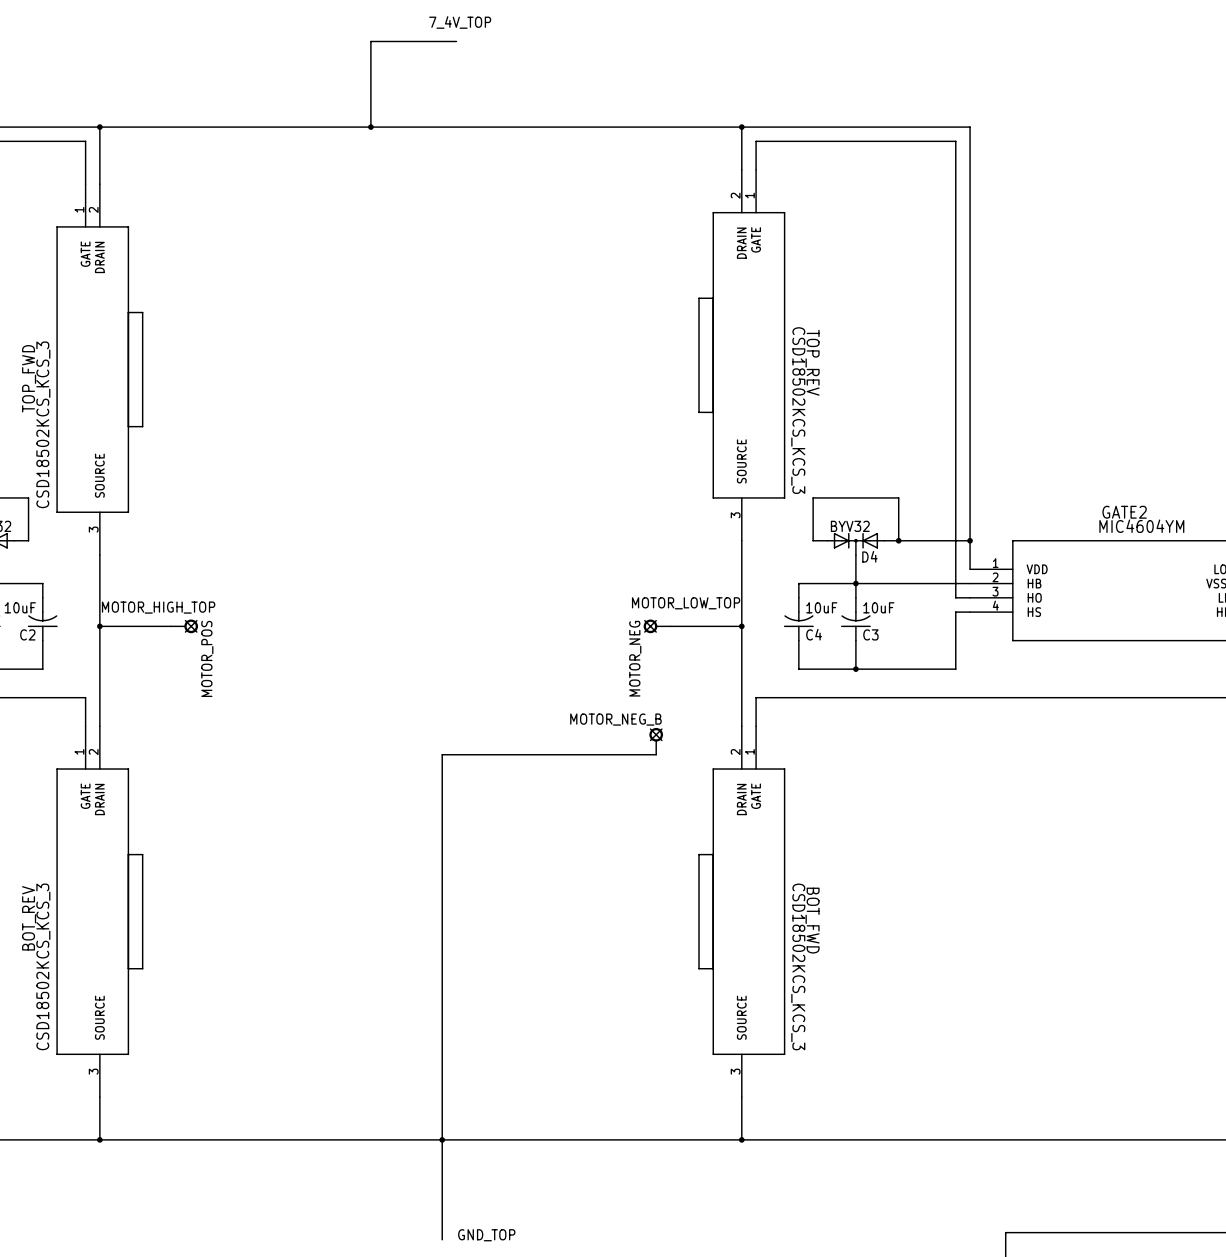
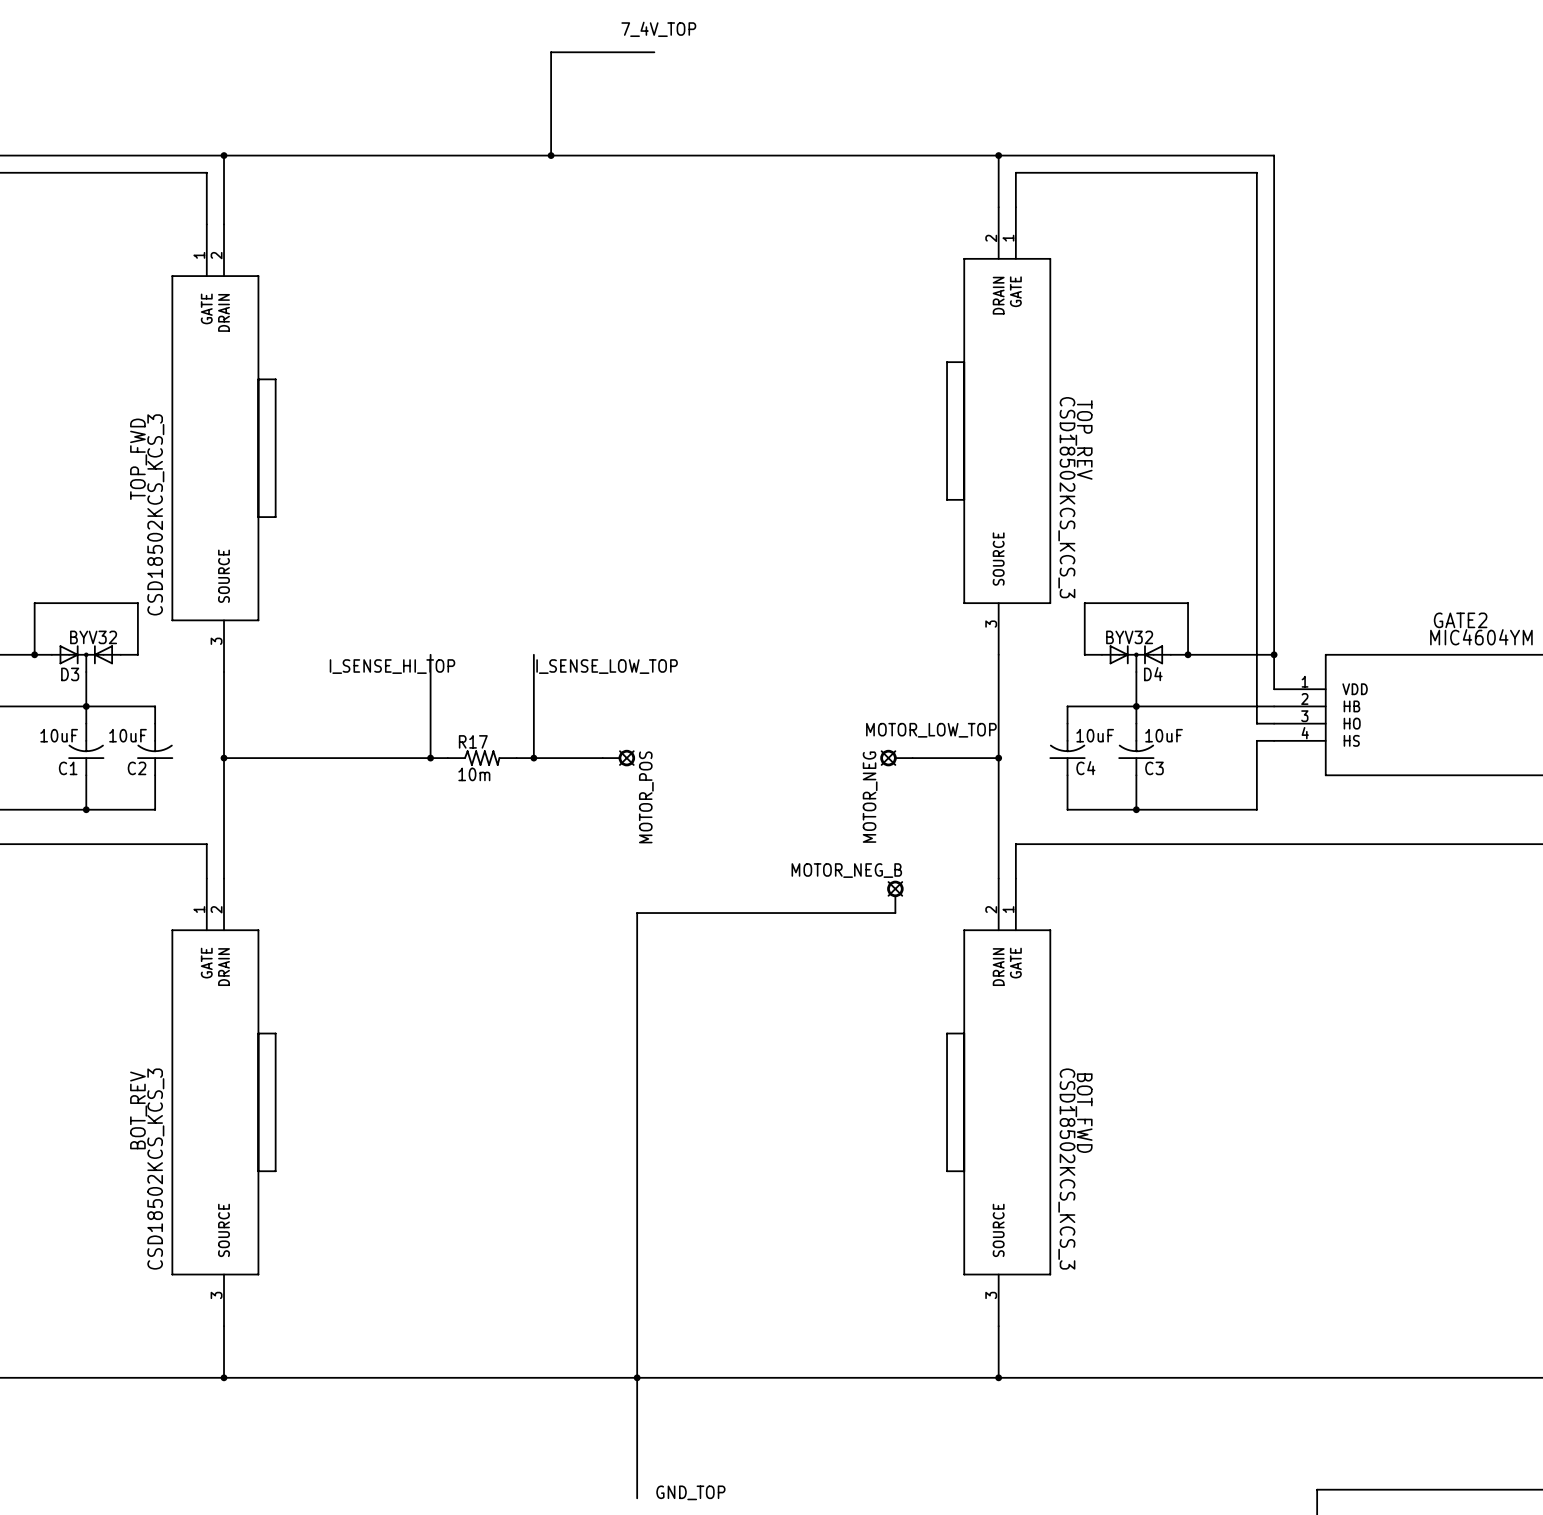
wire: none -> (430, 654) (430, 758)
wire: none -> (533, 654) (533, 758)
label: none -> I_SENSE_HI_TOP (392, 666)
label: none -> I_SENSE_LOW_TOP (607, 666)
label: MOTOR_HIGH_TOP (158, 607) -> none
wire: none -> (310, 758) (447, 758)
MOTOR_POS: (184, 626) -> none
junction: none -> (430, 758)
R17: none -> 10m (482, 758)
wire: none -> (516, 758) (602, 758)
junction: none -> (533, 758)
MOTOR_POS: none -> (618, 758)

